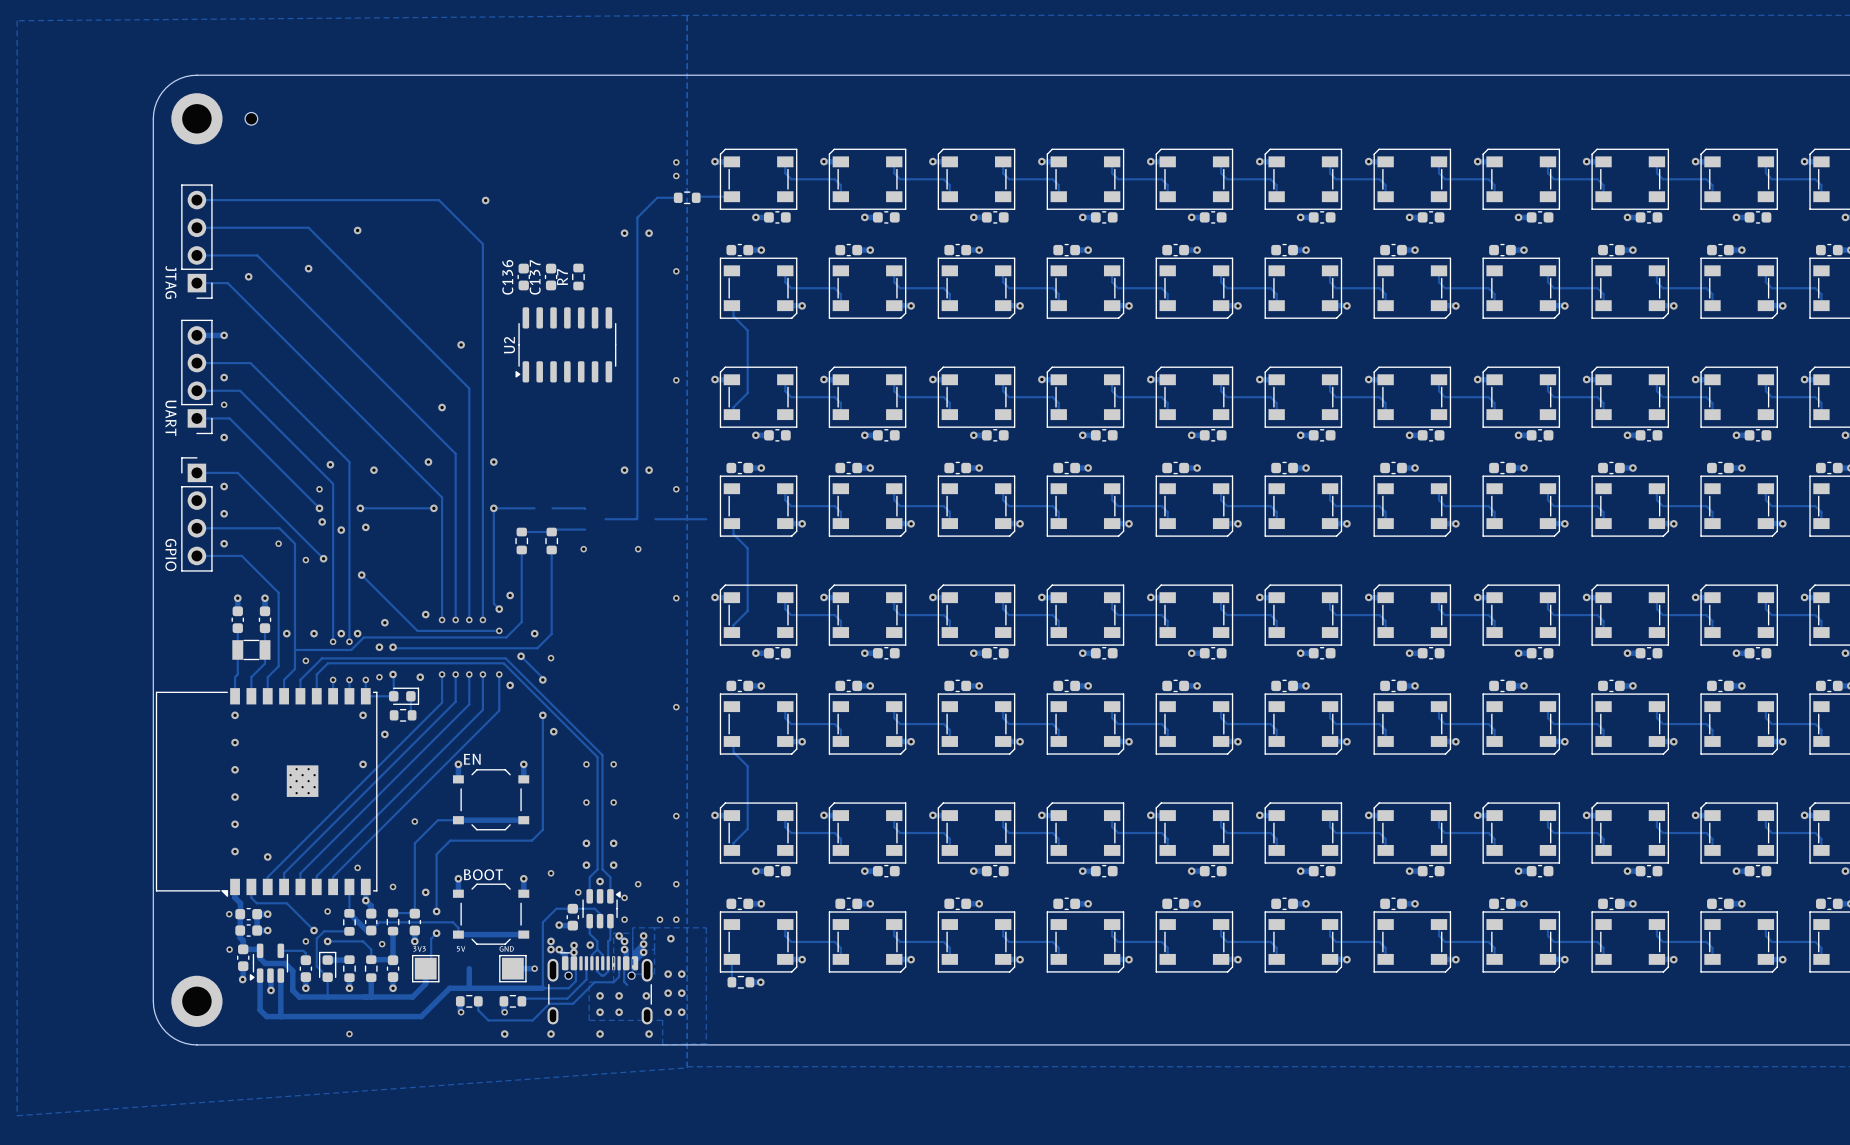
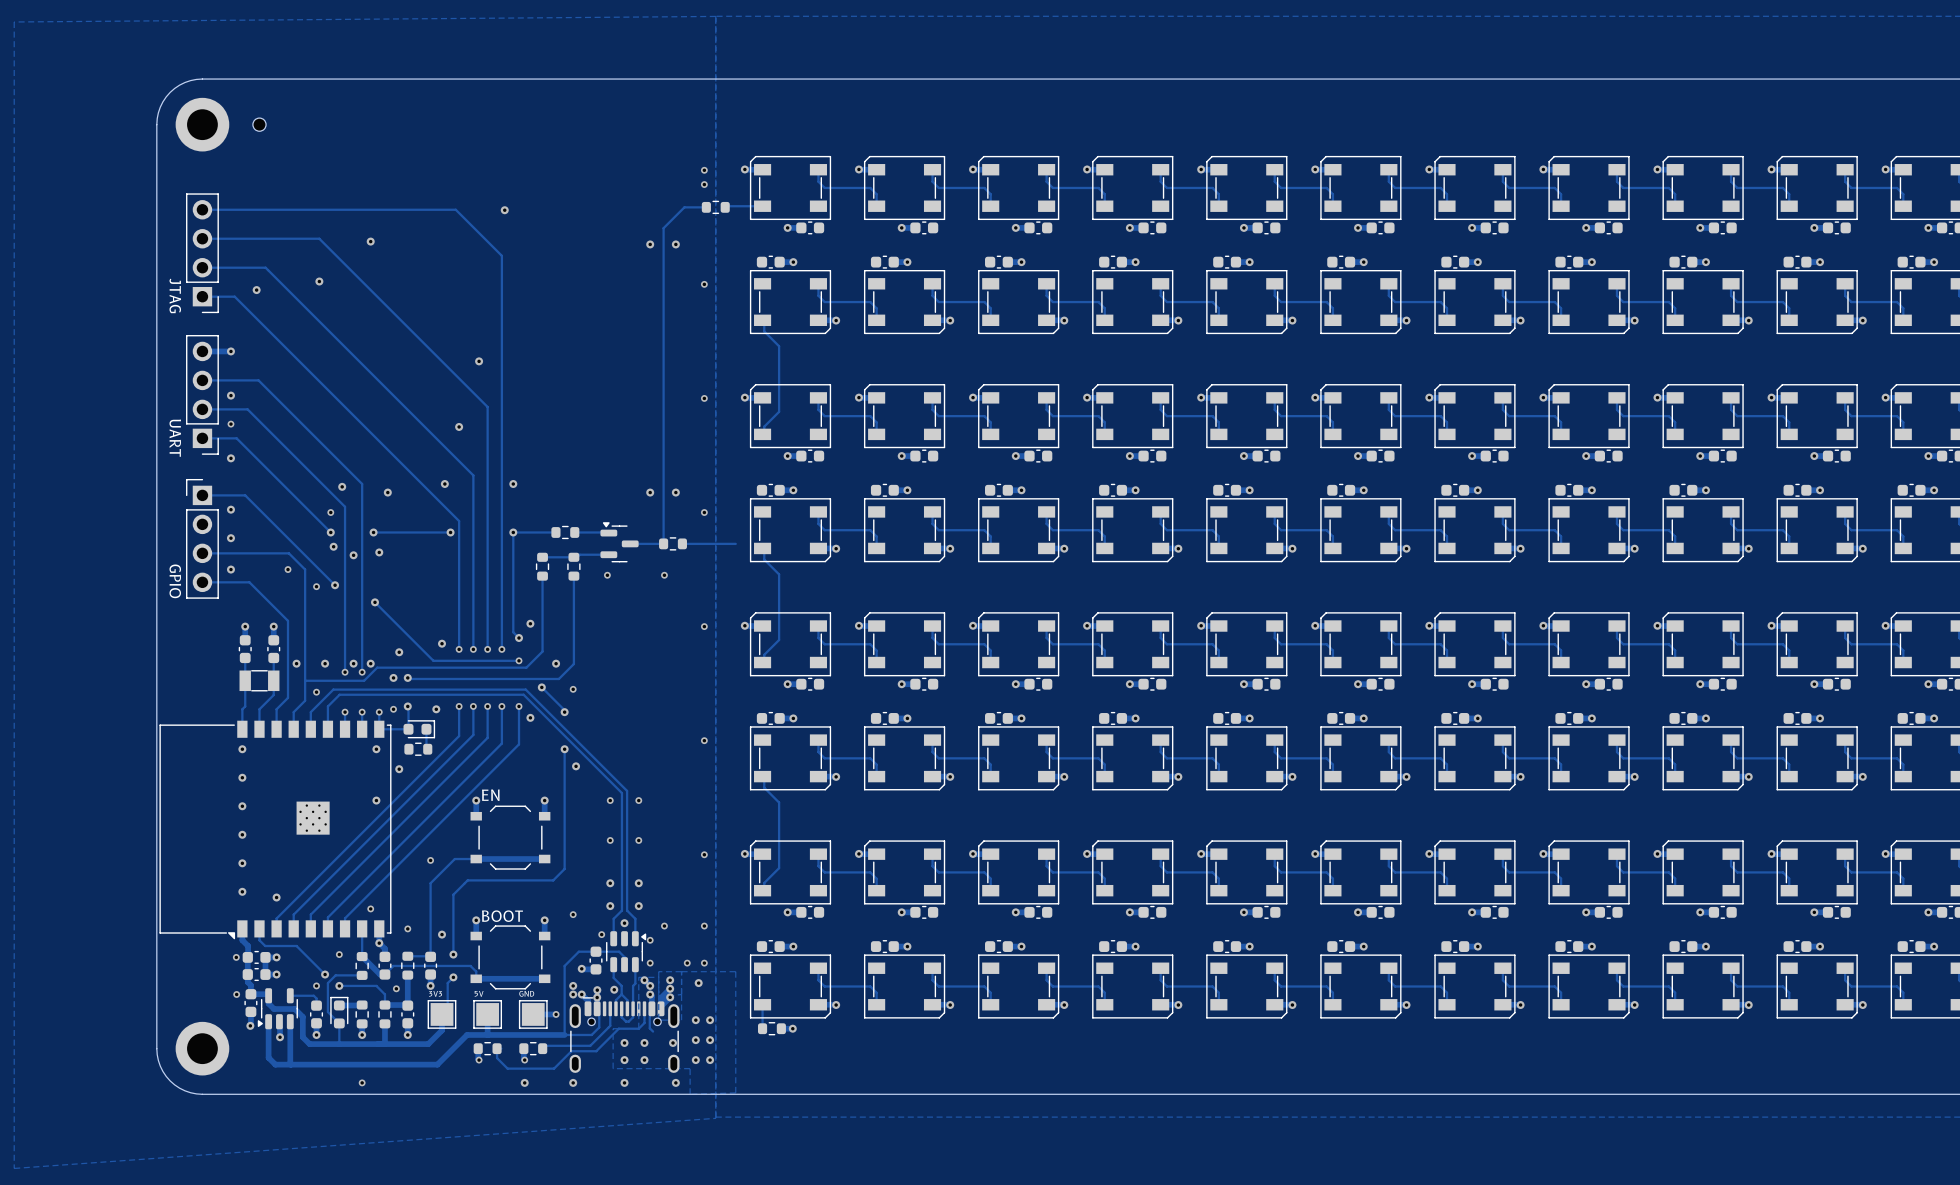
C136: (523, 277) -> none
C137: (551, 277) -> none
R7: (578, 277) -> none
U2: (565, 344) -> none
part: none -> (565, 532)
part: none -> (619, 542)
part: none -> (673, 543)
part: none -> (487, 1014)

